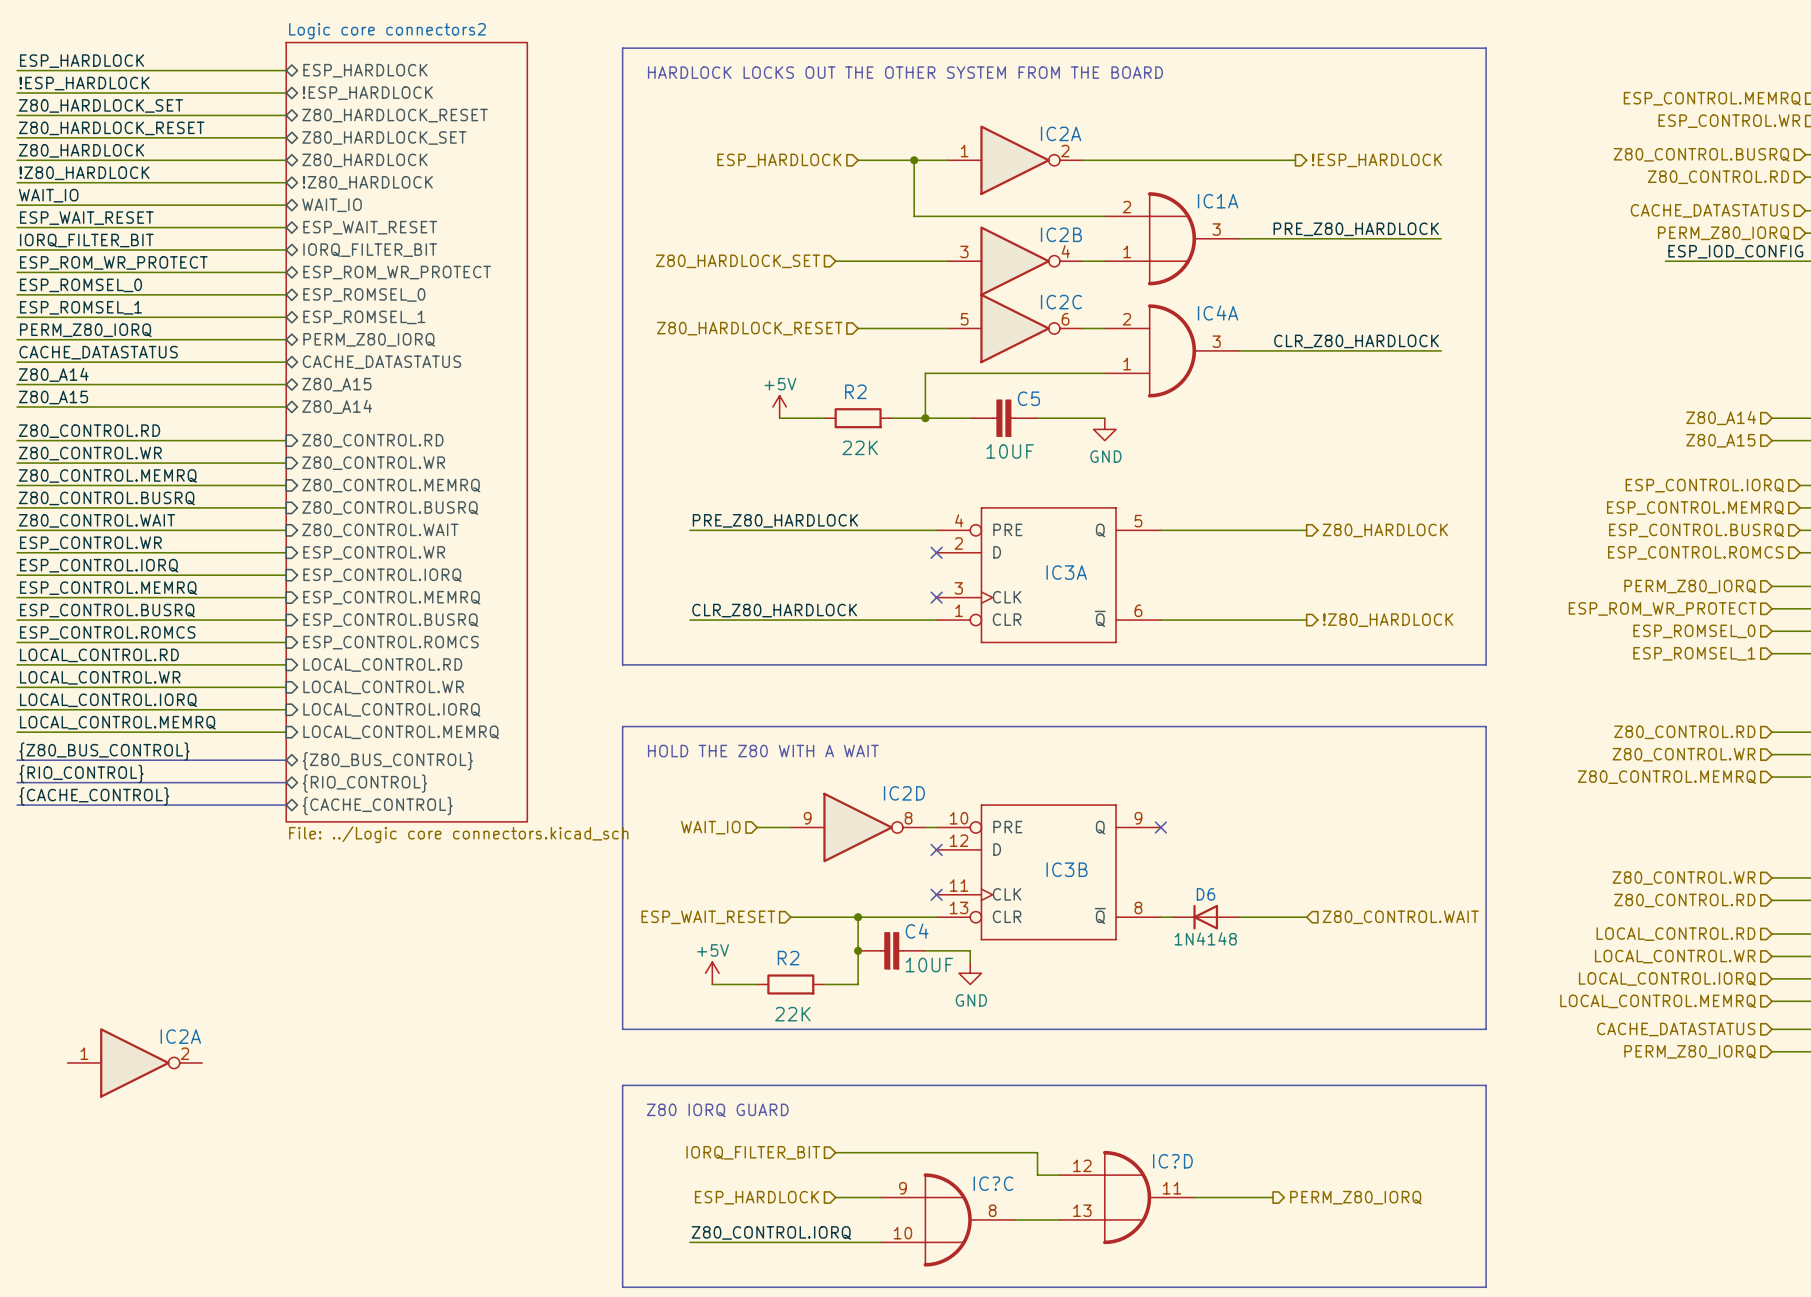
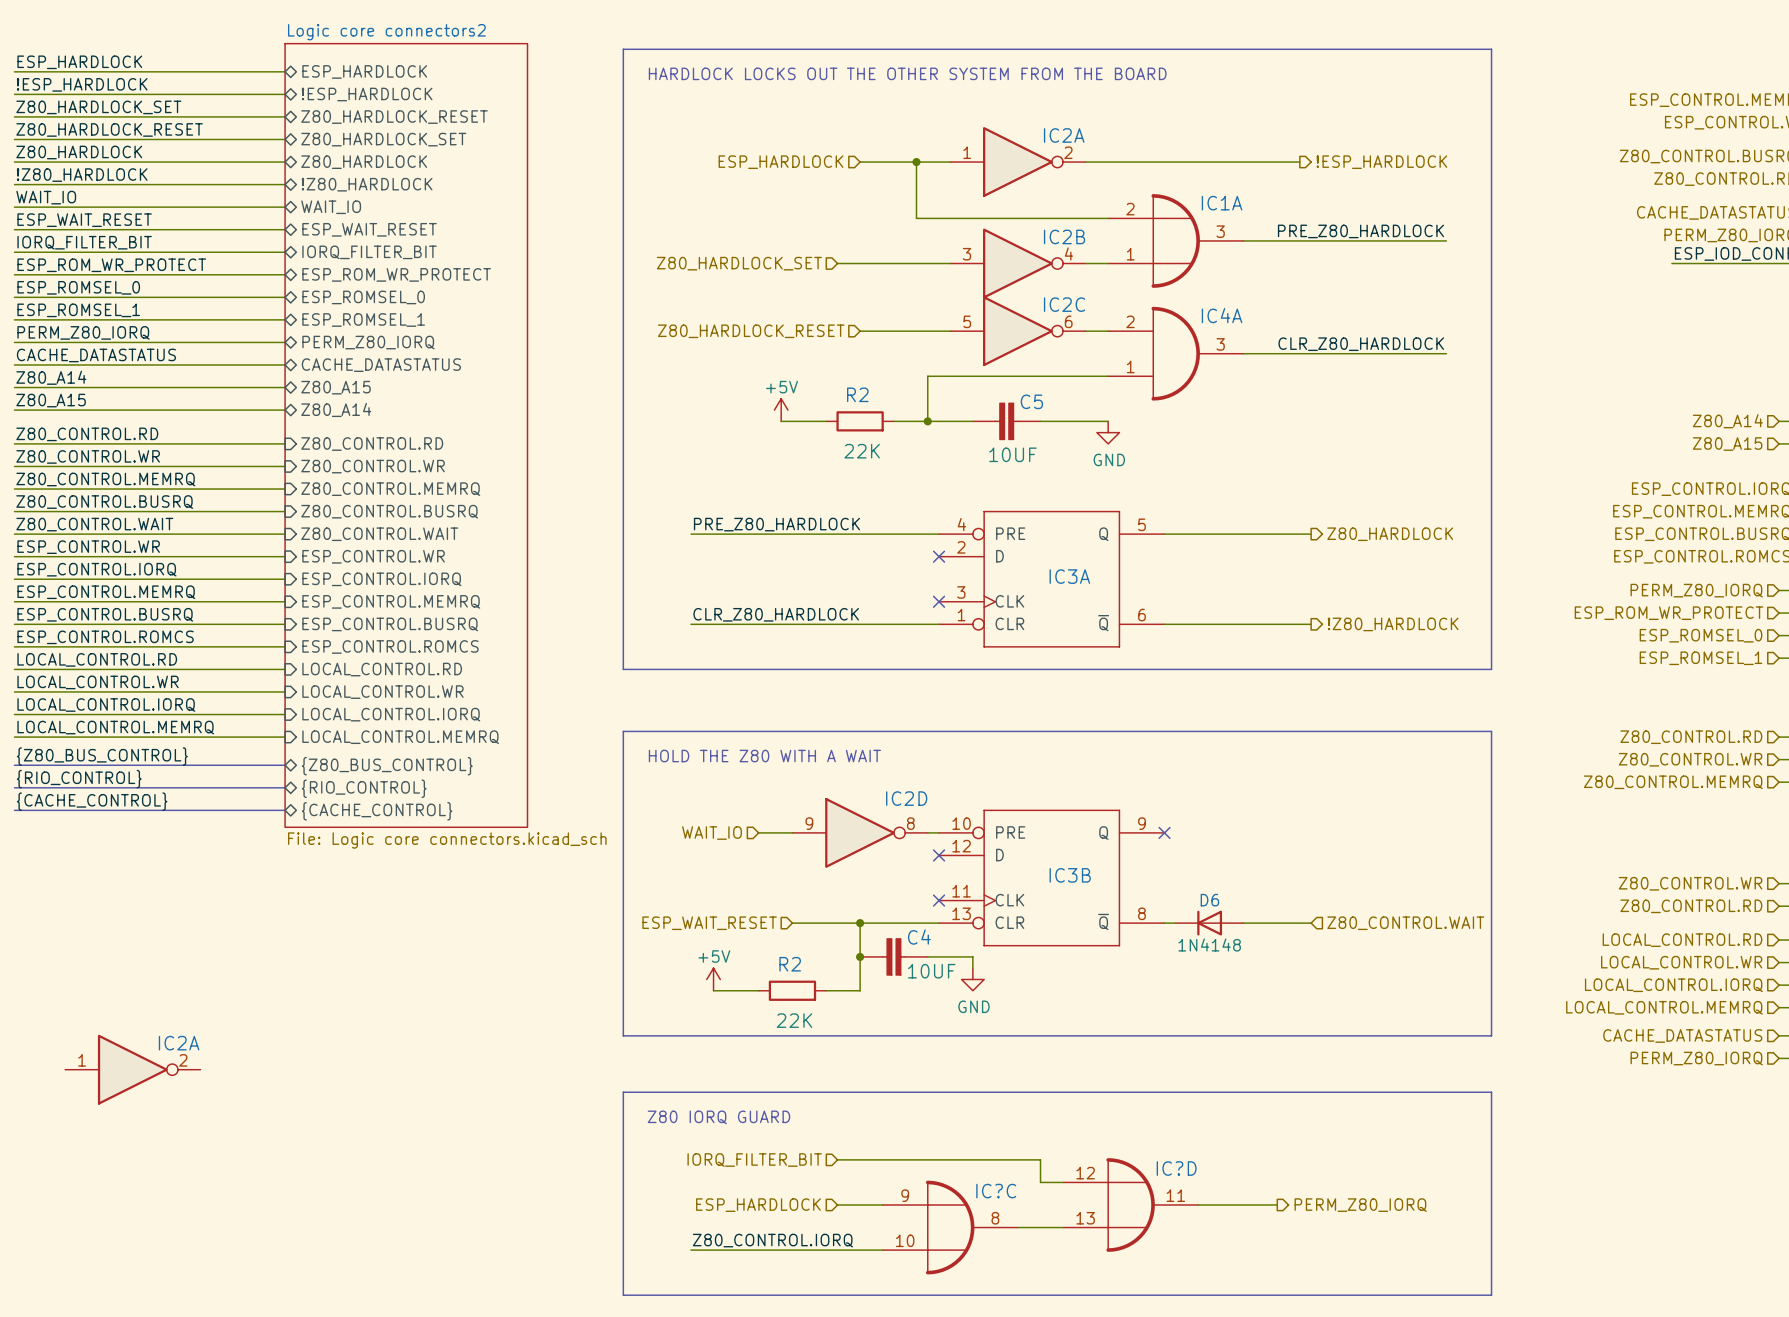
sheet Logic core connectors2 value: File: ../Logic core connectors.kicad_sch (458, 834) -> File: Logic core connectors.kicad_sch (447, 840)

